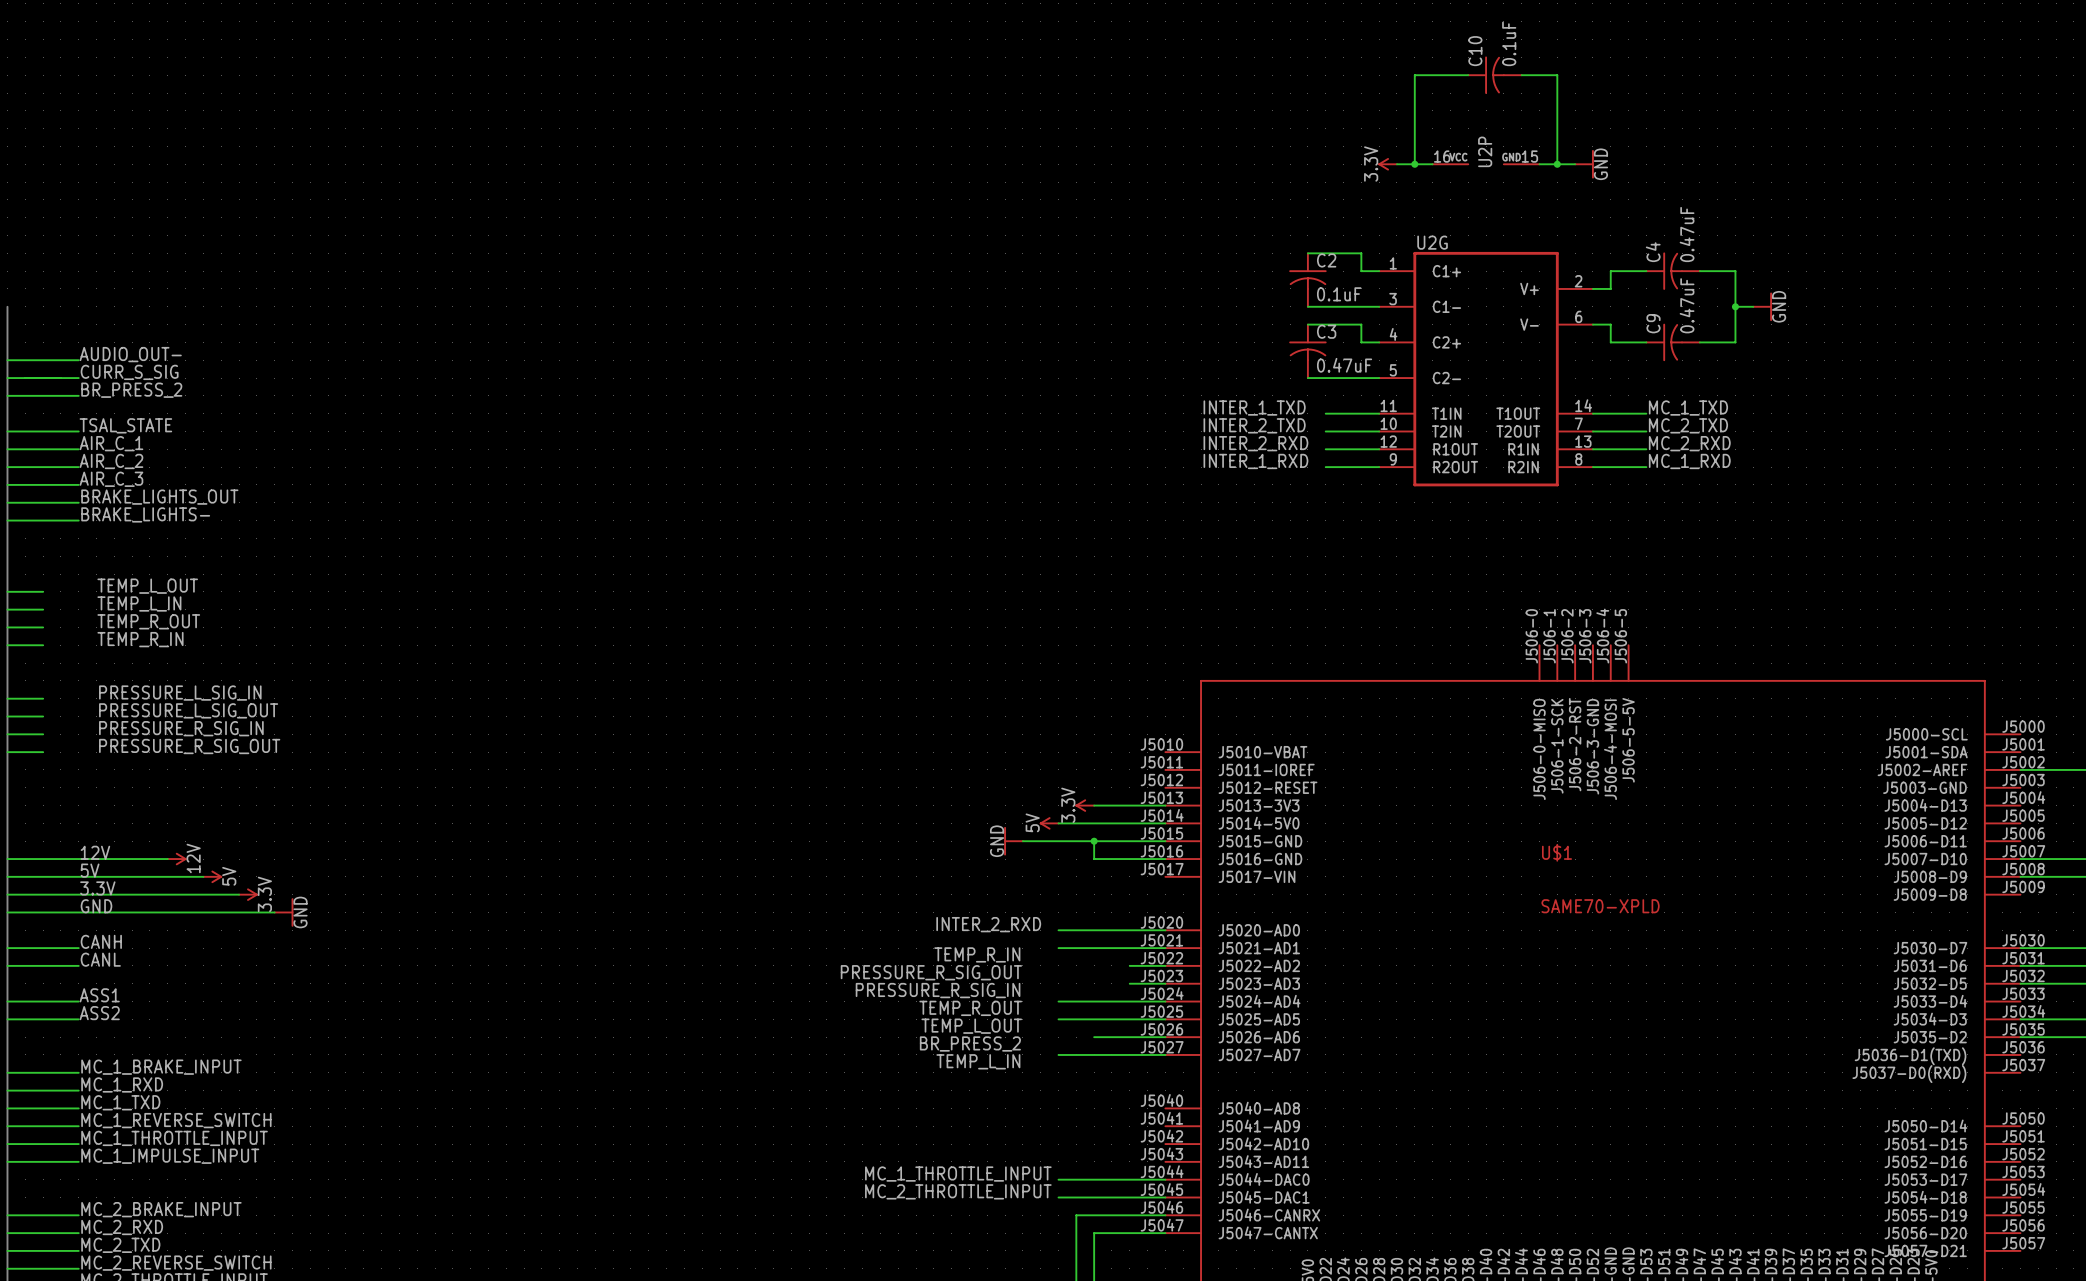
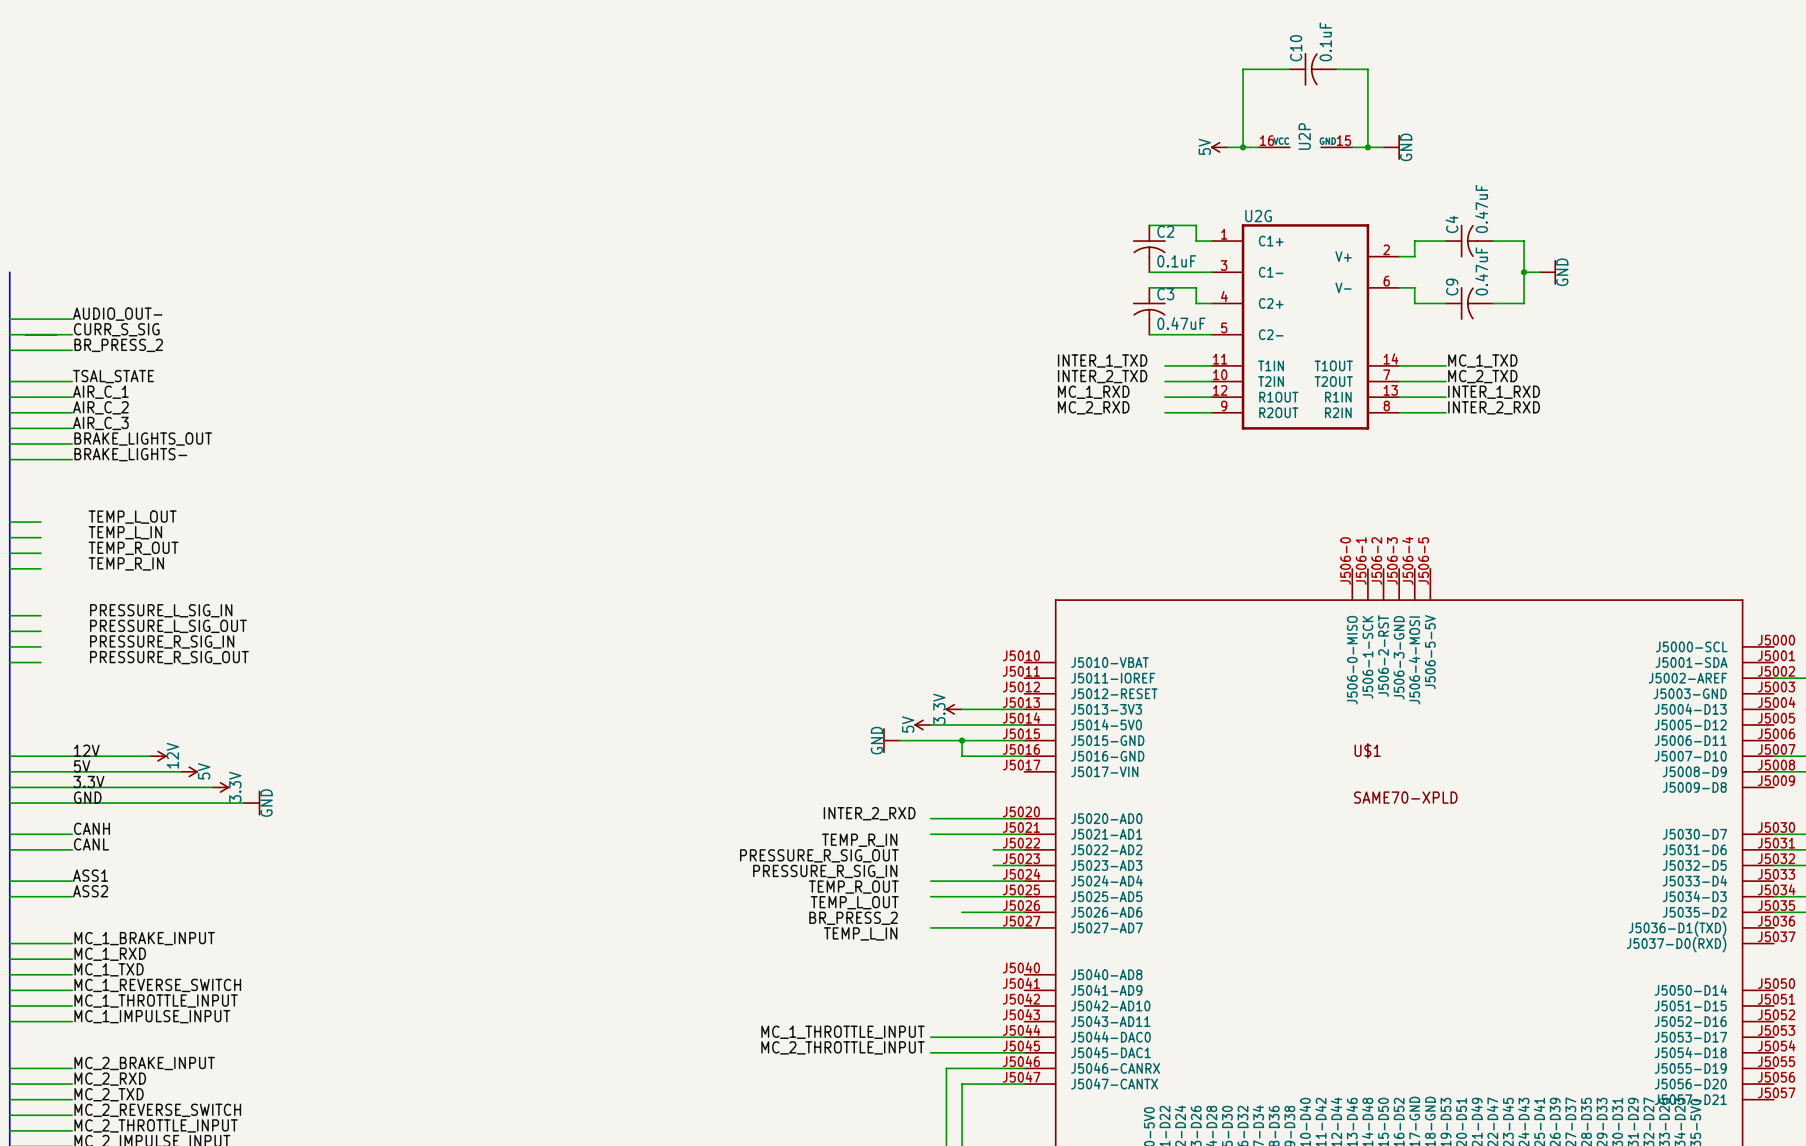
power symbol: 3.3V (1387, 164) -> 5V (1219, 147)
label: INTER_2_RXD (1255, 443) -> MC_1_RXD (1093, 392)
label: MC_2_RXD (1689, 443) -> INTER_1_RXD (1494, 392)
label: INTER_1_RXD (1255, 461) -> MC_2_RXD (1093, 407)
label: MC_1_RXD (1689, 461) -> INTER_2_RXD (1494, 407)

